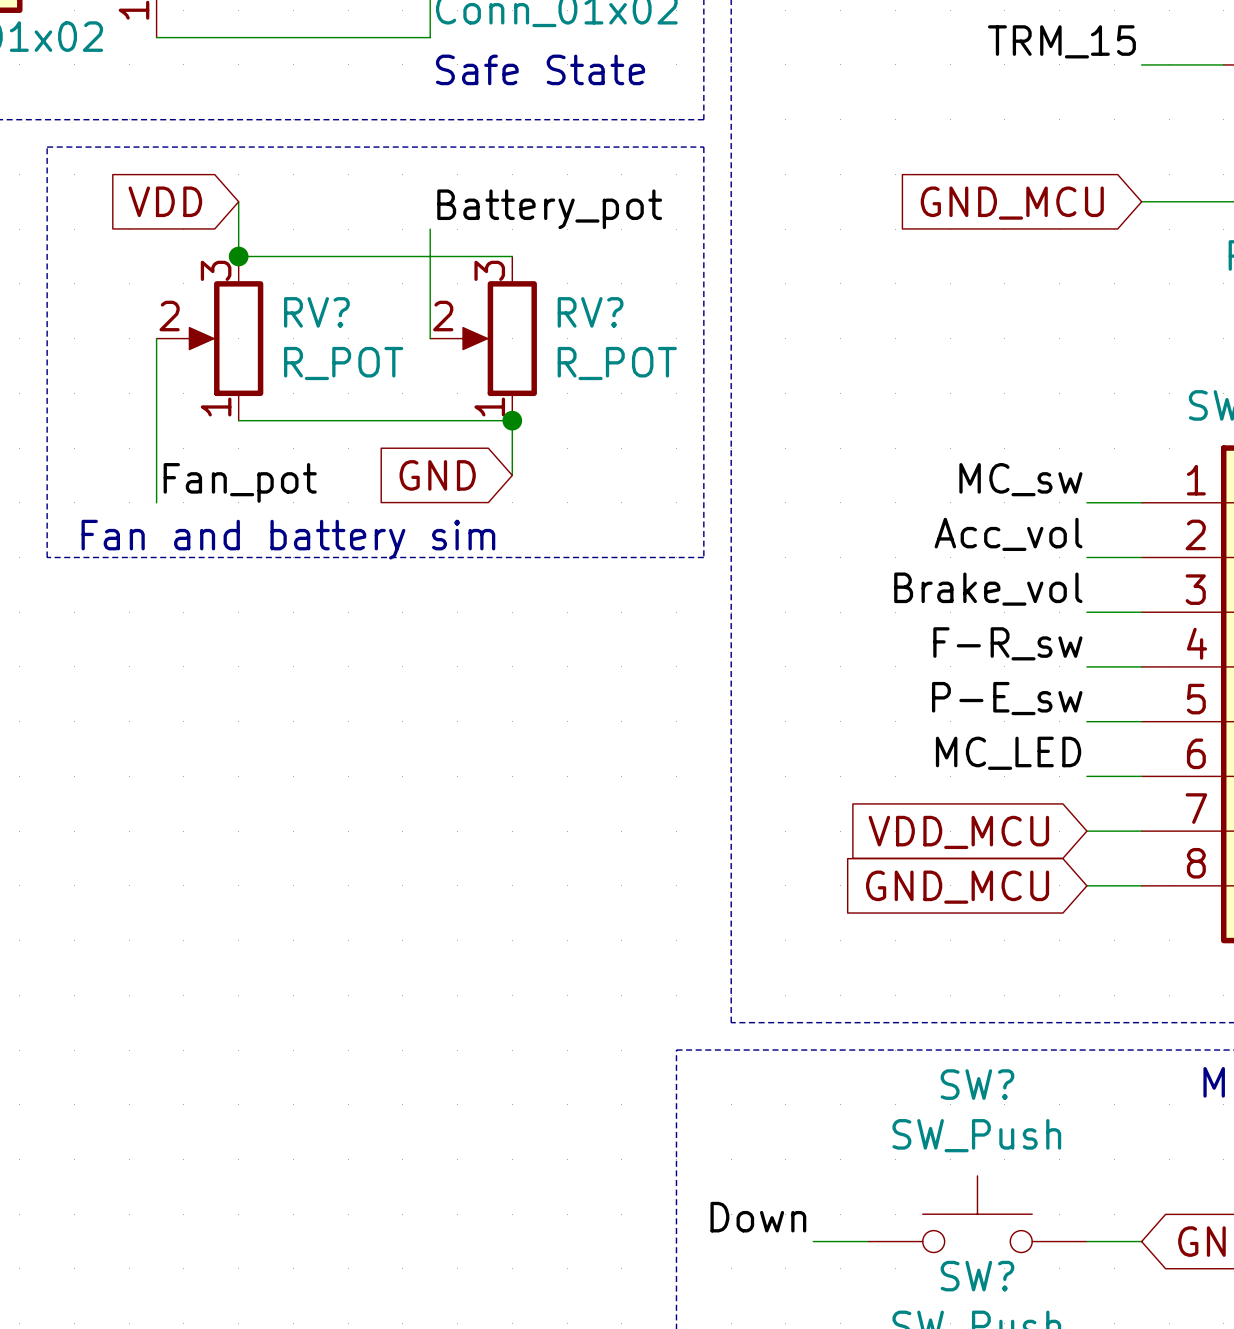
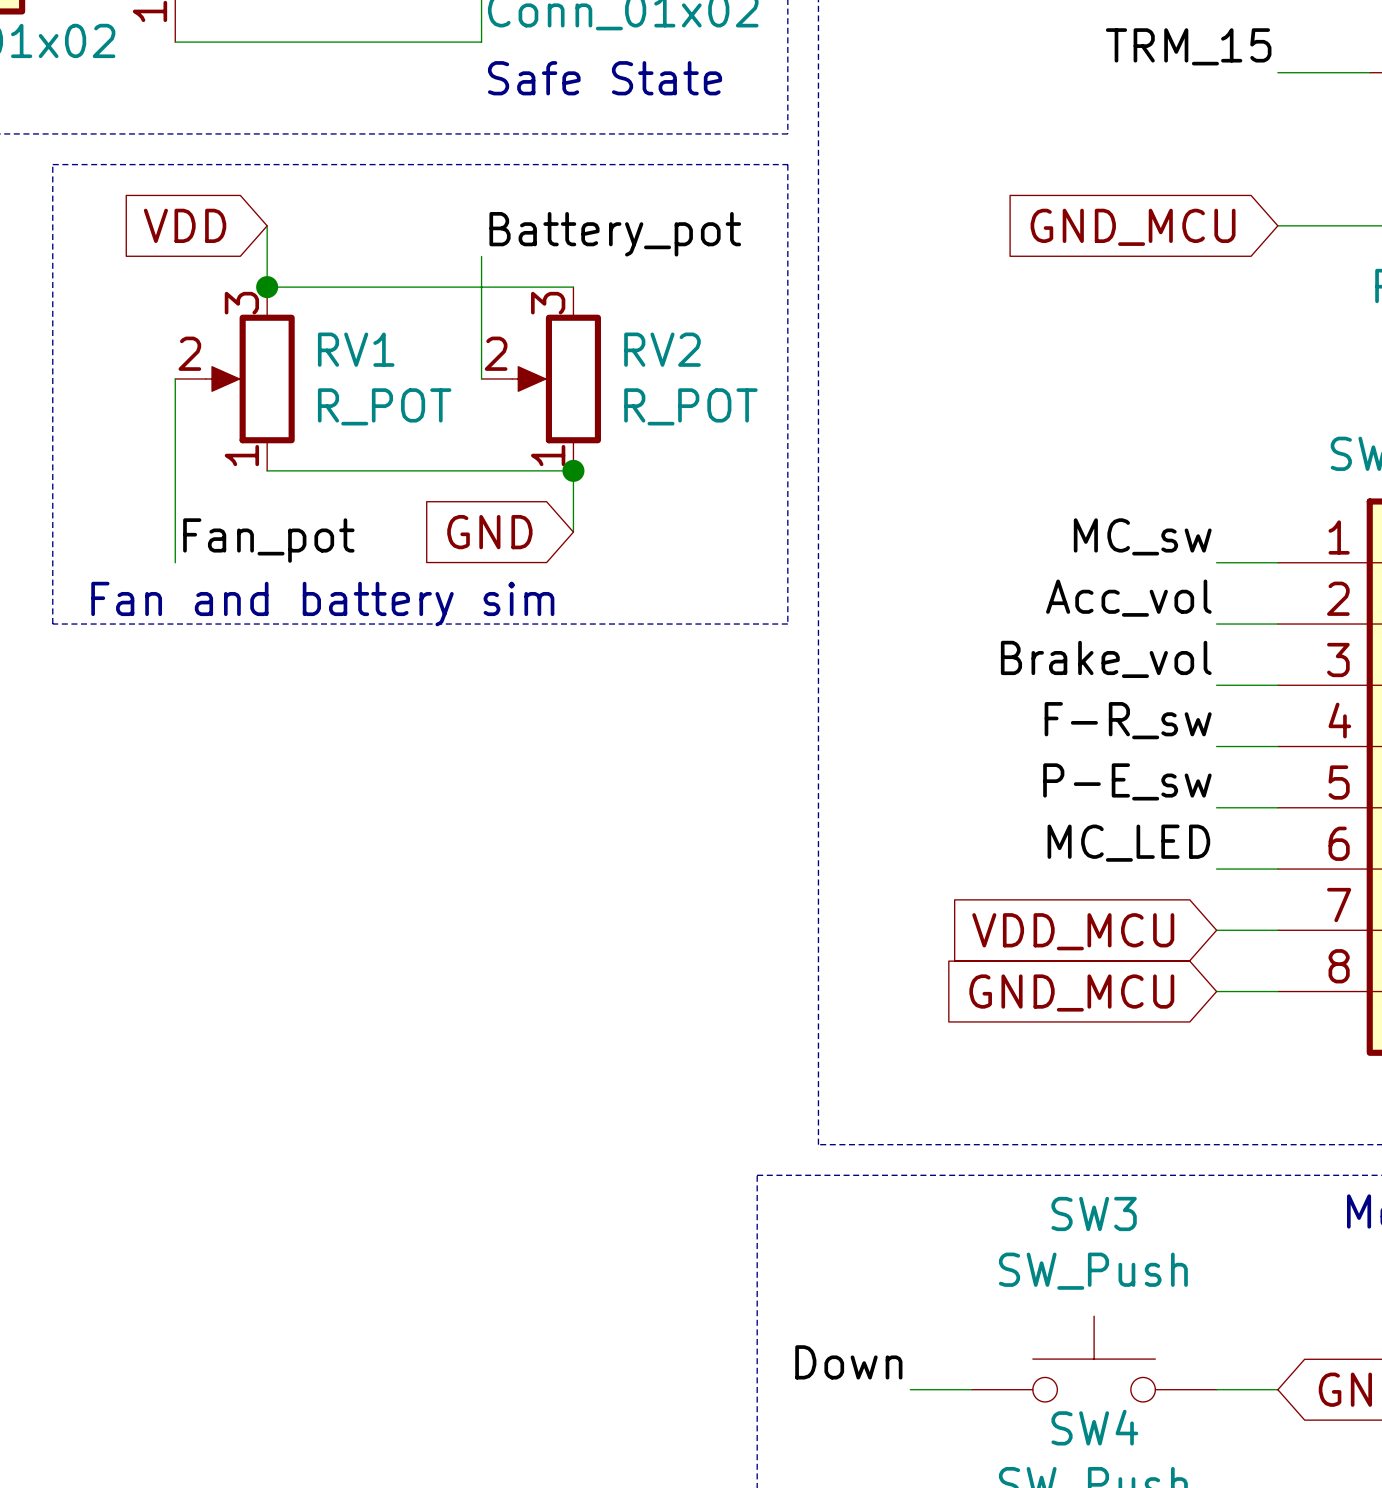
RV? name: RV? (316, 312) -> RV1 (356, 349)
RV? name: RV? (590, 312) -> RV2 (662, 349)
SW? name: SW? (977, 1084) -> SW3 (1094, 1213)
SW? name: SW? (977, 1276) -> SW4 (1094, 1427)

